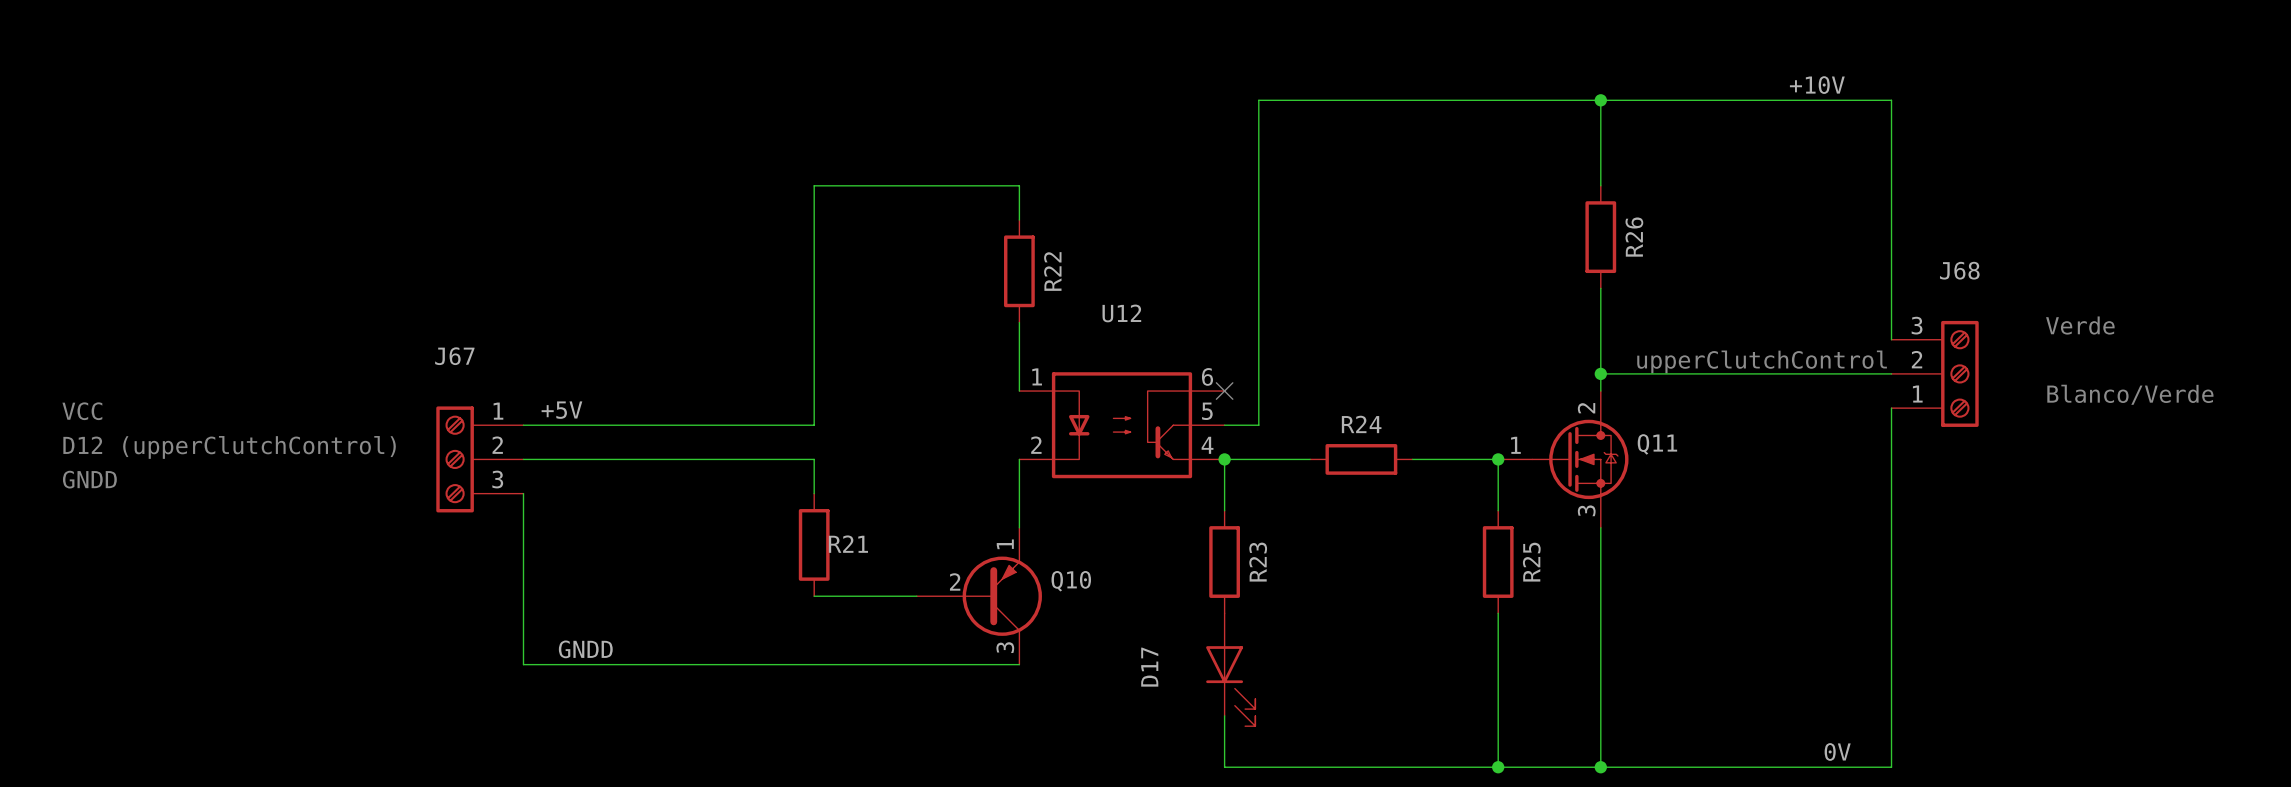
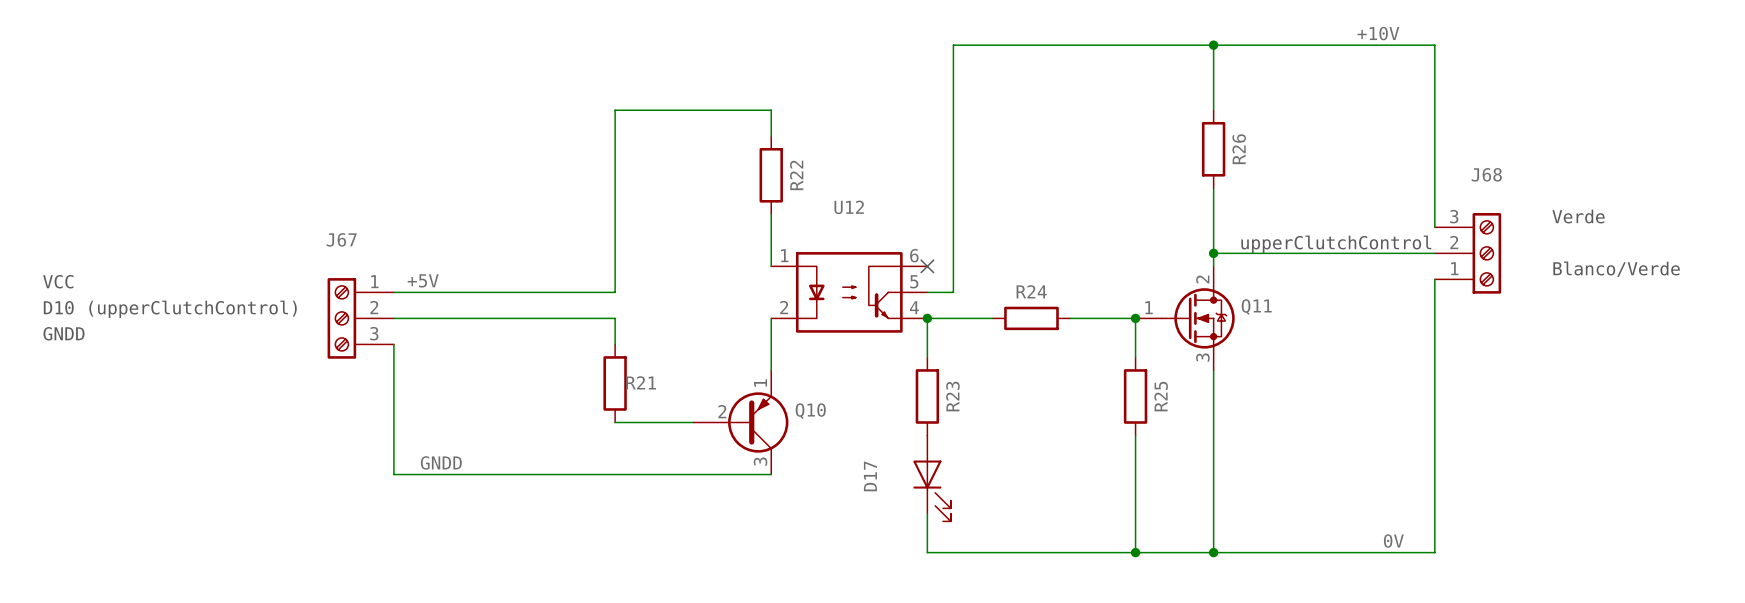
text: D12 (upperClutchControl) (229, 447) -> D10 (upperClutchControl) (170, 309)

